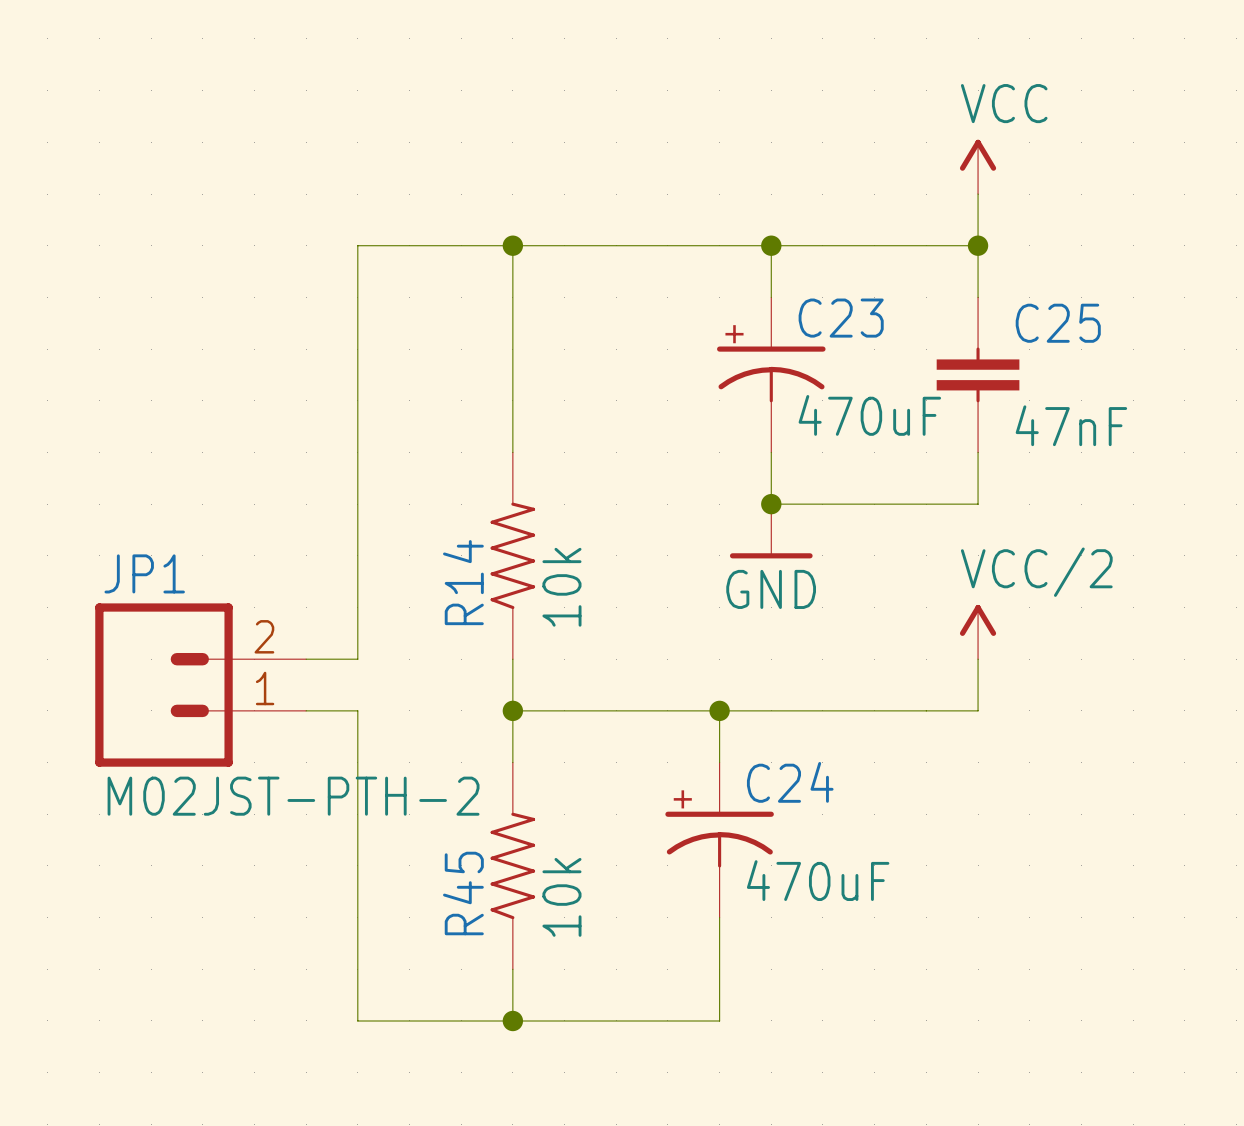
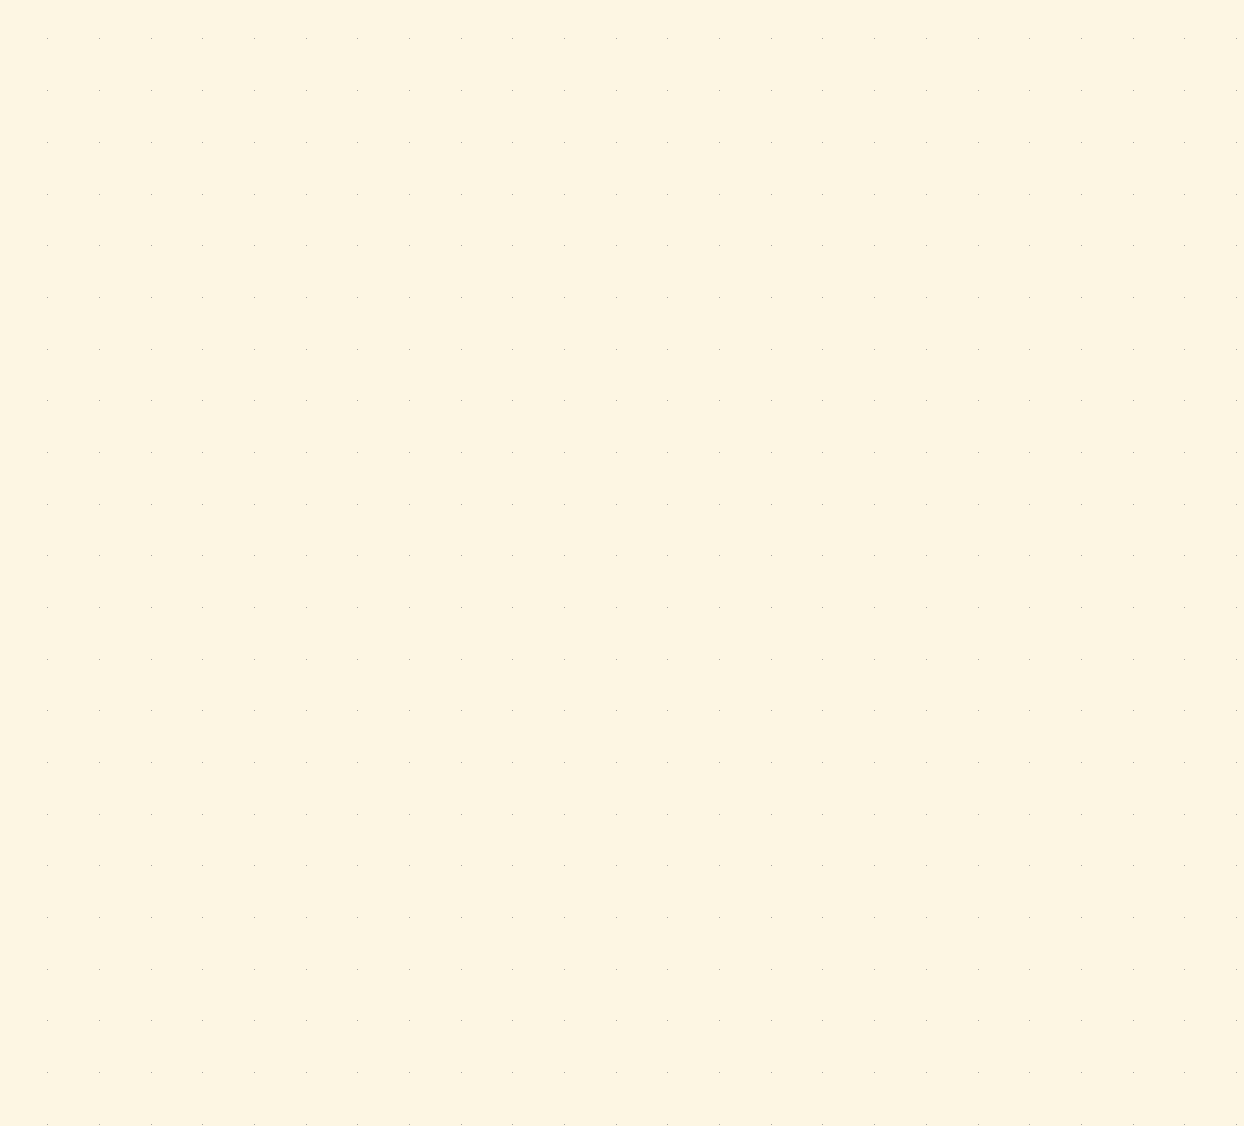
power symbol: VCC (978, 166) -> none
wire: (978, 194) (978, 297) -> none
wire: (512, 245) (512, 452) -> none
junction: (512, 245) -> none
wire: (771, 245) (771, 297) -> none
junction: (771, 245) -> none
wire: (978, 245) (357, 245) (357, 659) (306, 659) -> none
junction: (978, 245) -> none
C23: 470uF (771, 374) -> none
C25: 47nF (978, 374) -> none
wire: (771, 452) (771, 504) (978, 504) (978, 452) -> none
junction: (771, 504) -> none
power symbol: GND (771, 531) -> none
R14: 10k (512, 555) -> none
power symbol: VCC/2 (978, 632) -> none
wire: (512, 659) (512, 762) -> none
wire: (978, 659) (978, 710) (512, 710) -> none
JP1: M02JST-PTH-2 (200, 685) -> none
wire: (306, 710) (357, 710) (357, 1020) (719, 1020) (719, 917) -> none
junction: (512, 710) -> none
wire: (719, 710) (719, 762) -> none
junction: (719, 710) -> none
C24: 470uF (719, 840) -> none
R45: 10k (512, 865) -> none
wire: (512, 969) (512, 1020) -> none
junction: (512, 1020) -> none

